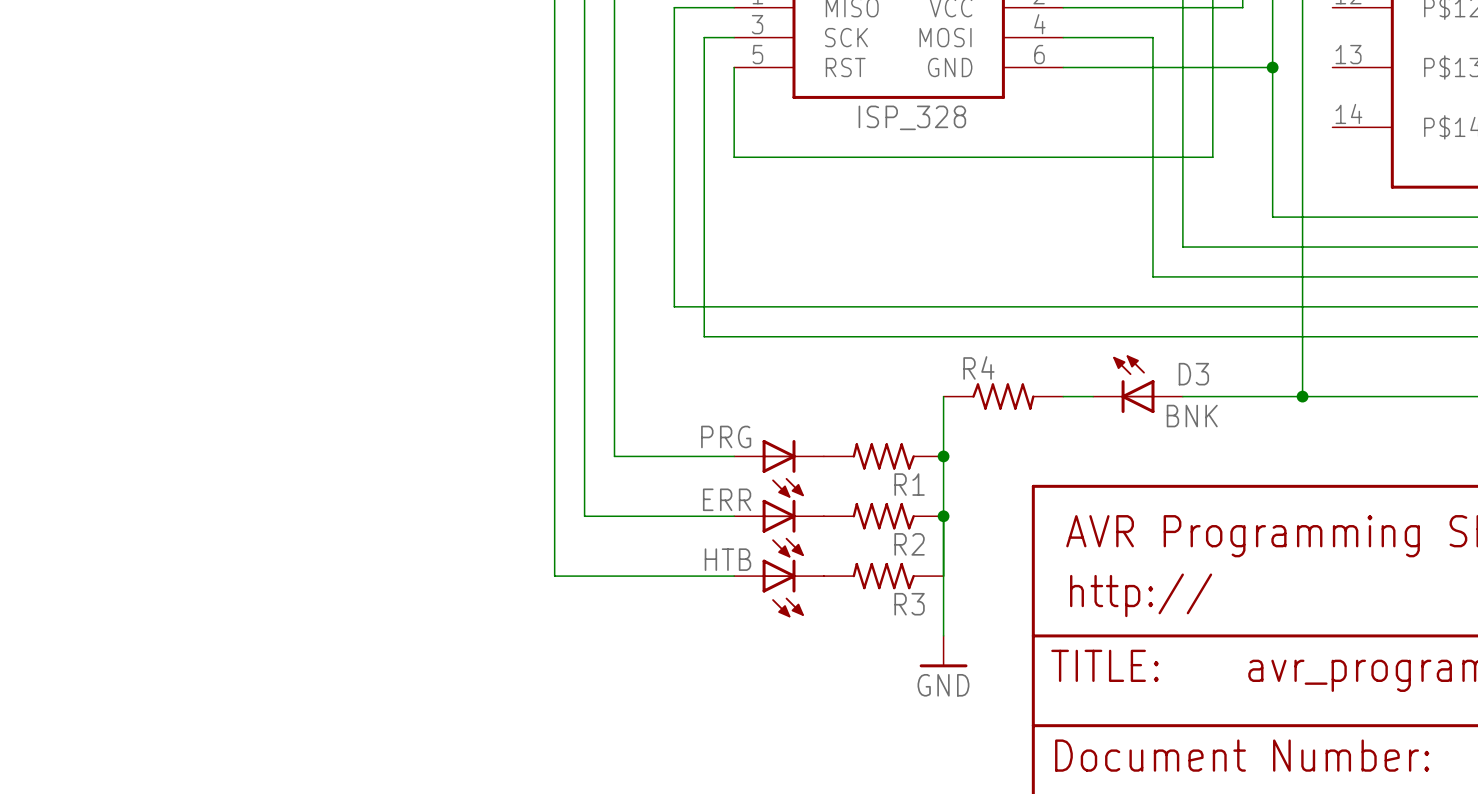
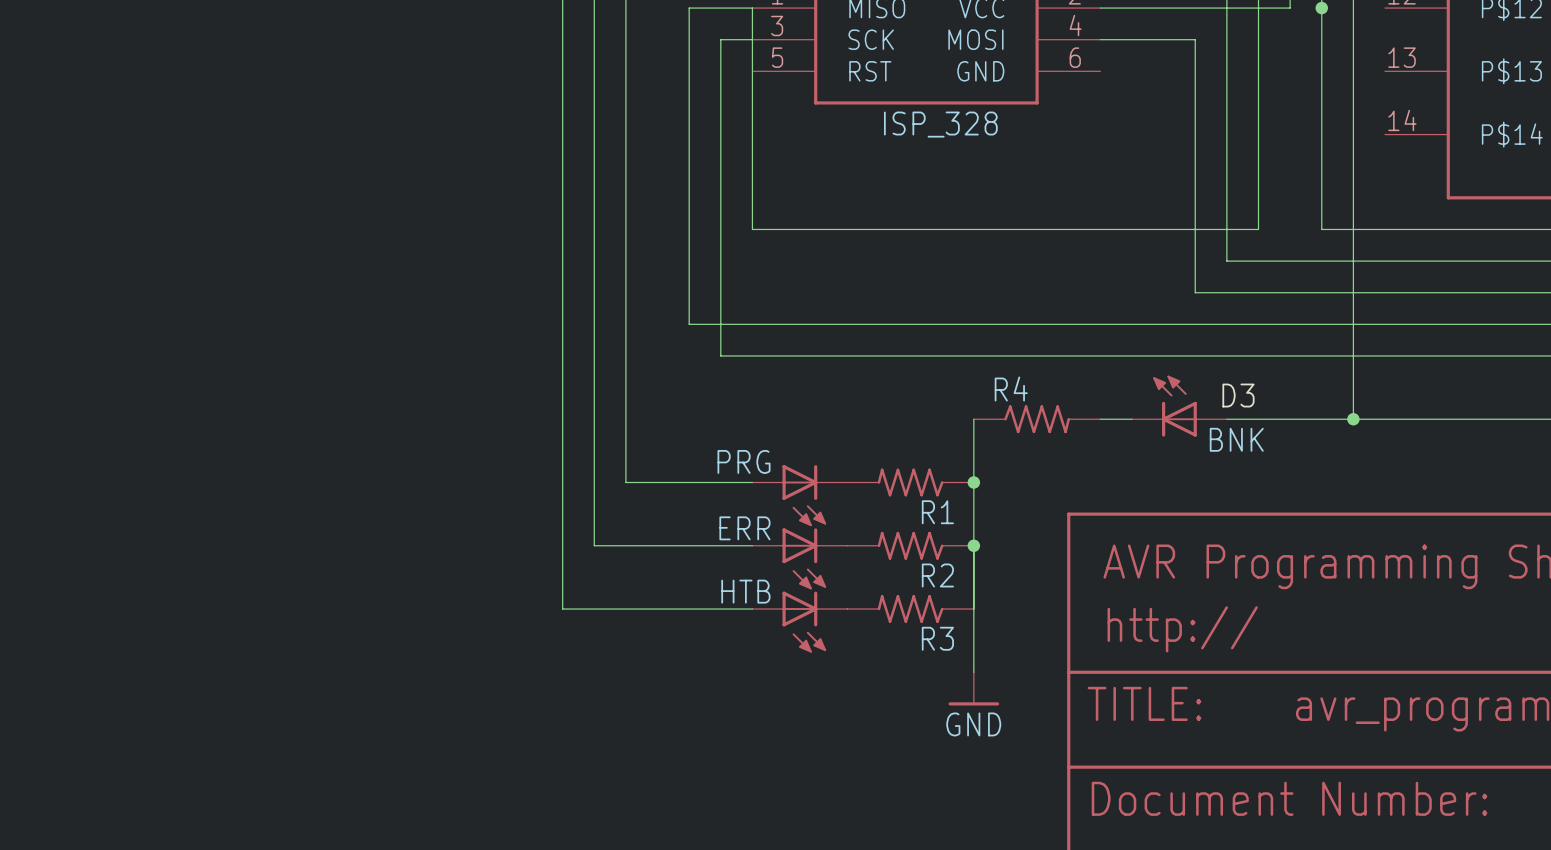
wire: none -> (752, 8) (752, 71)
wire: (1063, 67) (1272, 67) -> none
junction position: (1272, 67) -> (1321, 8)
wire: (734, 157) (1212, 157) -> (752, 166) (752, 229) (1258, 229) (1258, 166)

